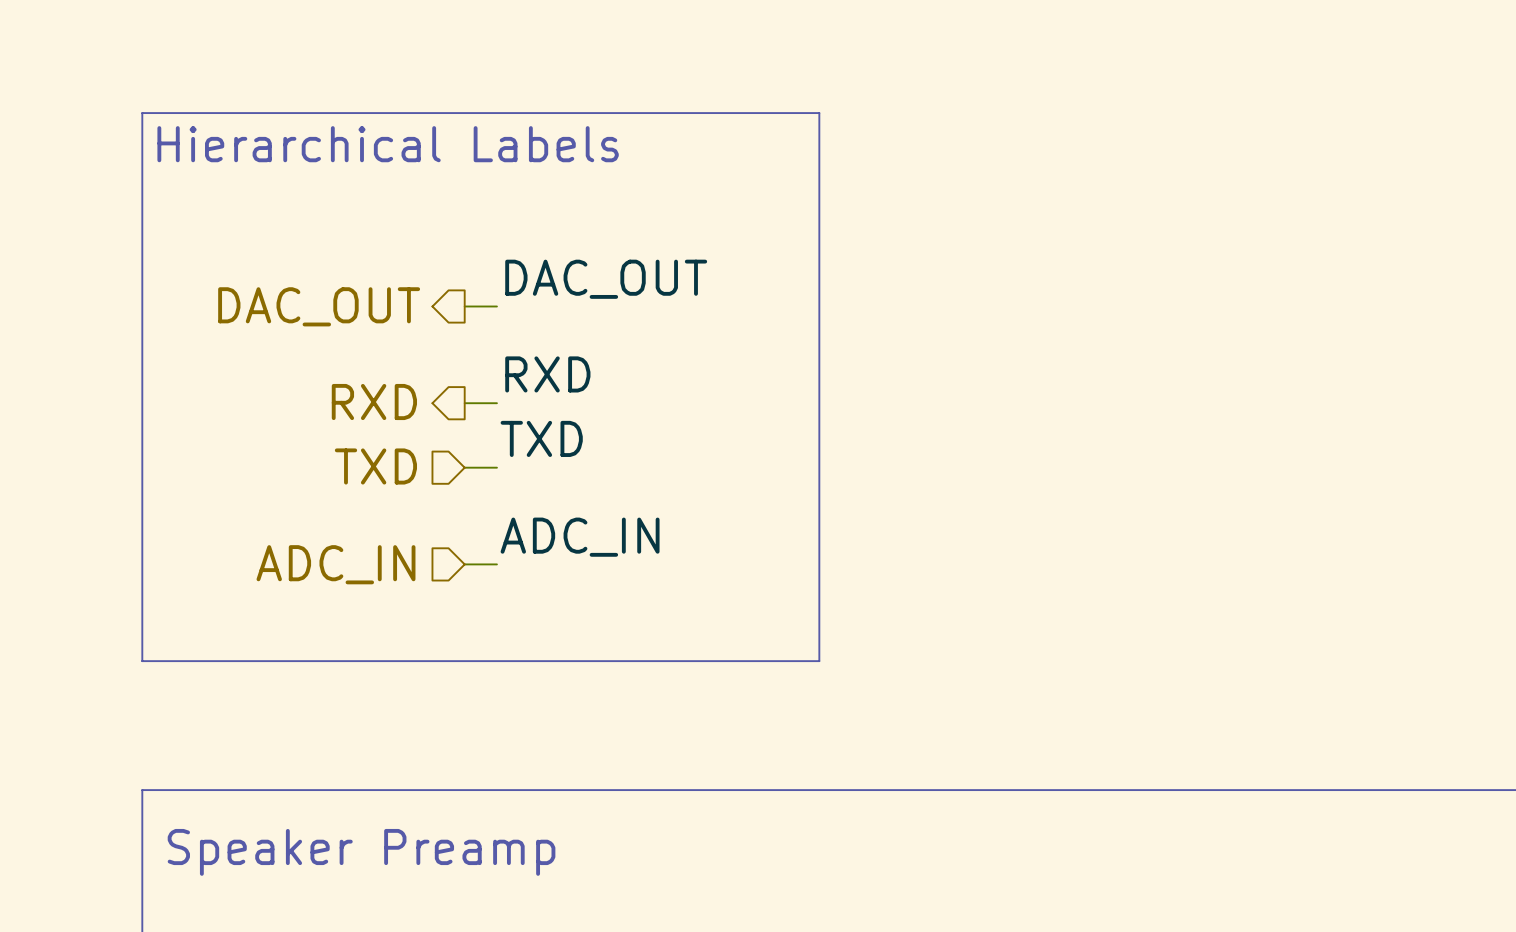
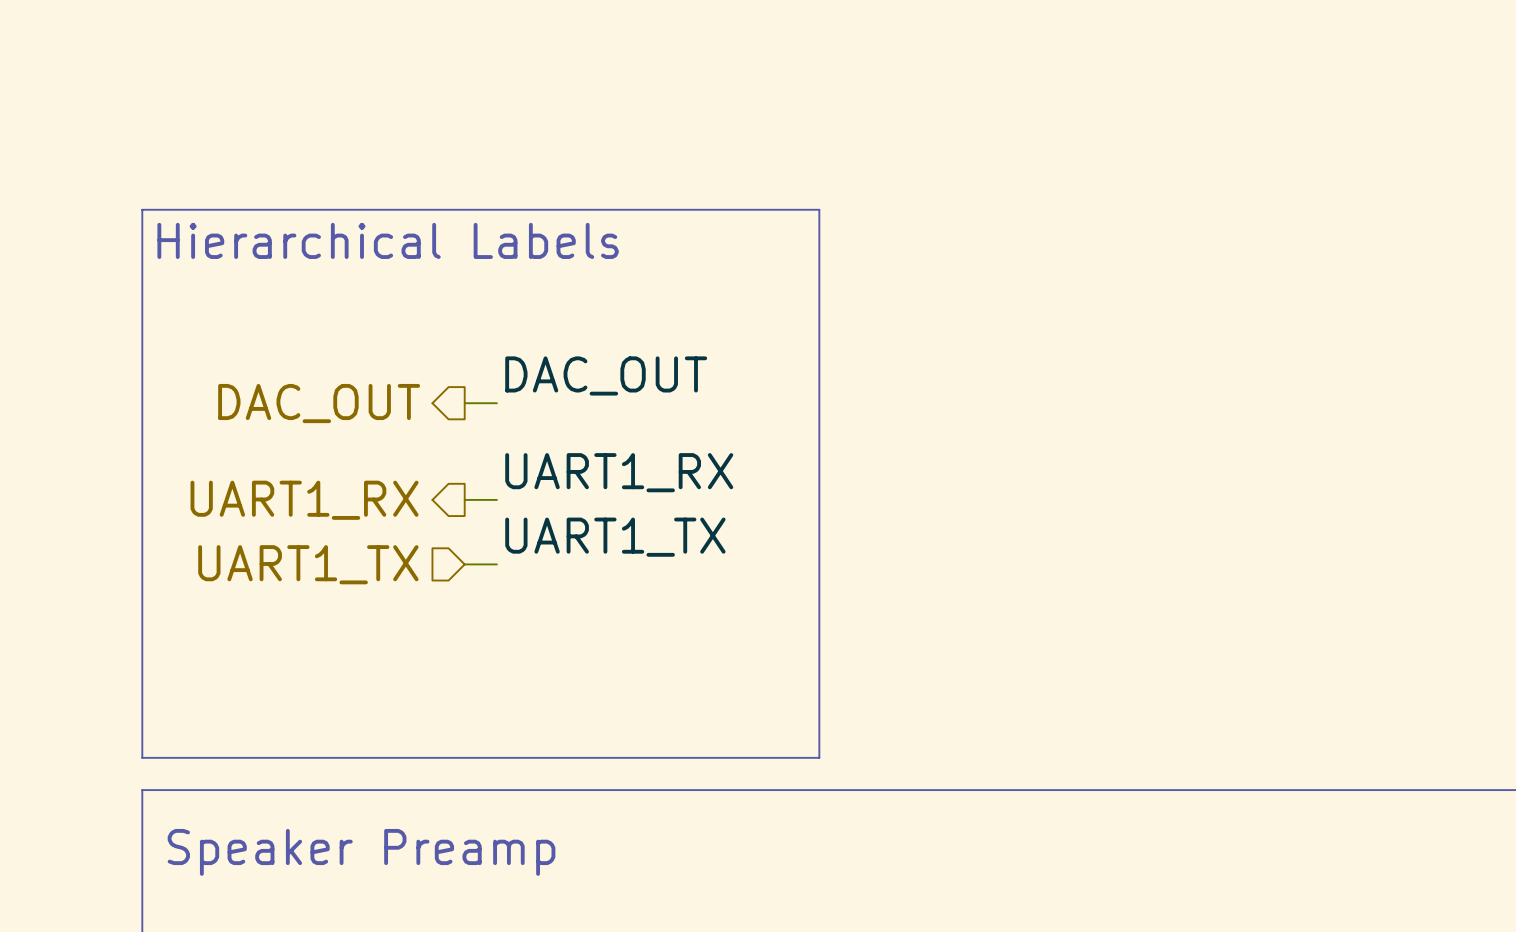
text position: Hierarchical Labels (388, 144) -> Hierarchical Labels (388, 240)
line: (142, 209) (142, 113) (819, 113) (819, 209) -> (142, 209) (819, 209)
label: DAC_OUT (606, 279) -> none
hierarchical label: DAC_OUT (319, 306) -> none
wire: (464, 306) (496, 306) -> none
label: RXD (547, 374) -> DAC_OUT (606, 375)
hierarchical label: RXD (374, 402) -> DAC_OUT (319, 403)
label: TXD (541, 438) -> none
hierarchical label: TXD (375, 466) -> none
wire: (464, 467) (496, 467) -> (464, 499) (496, 499)
label: none -> UART1_RX (619, 472)
hierarchical label: none -> UART1_RX (304, 500)
label: ADC_IN (580, 537) -> UART1_TX (615, 537)
hierarchical label: ADC_IN (336, 564) -> UART1_TX (308, 564)
line: (142, 661) (819, 661) -> (142, 661) (142, 757) (819, 757) (819, 661)

